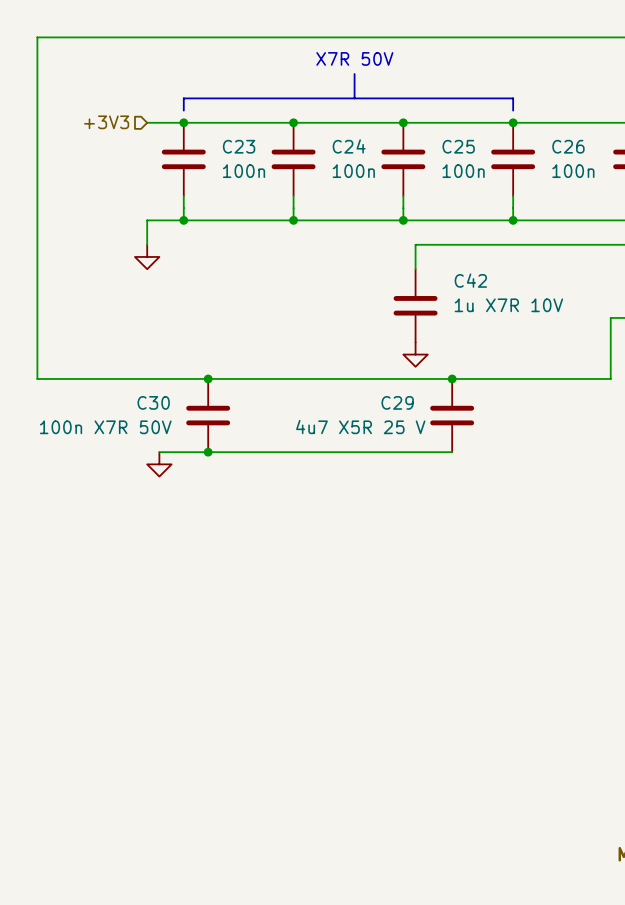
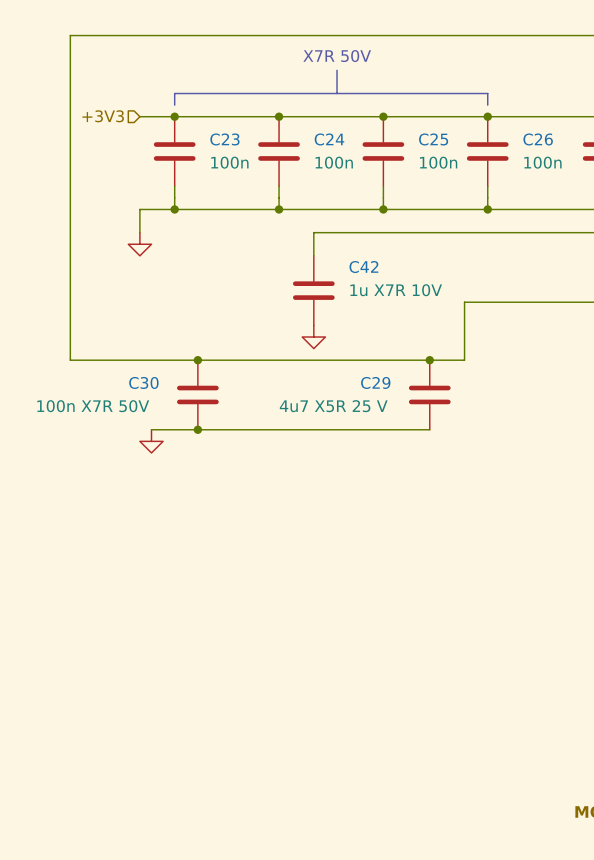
wire: (74, 37) (37, 37) (37, 378) (74, 378) -> (70, 35) (70, 360)
wire: (415, 244) (415, 269) -> (394, 232) (313, 232) (313, 255)
C42 position: (415, 305) -> (313, 290)
wire: (610, 317) (610, 378) (488, 378) -> (580, 302) (464, 302) (464, 360)
power symbol position: (415, 354) -> (313, 337)

